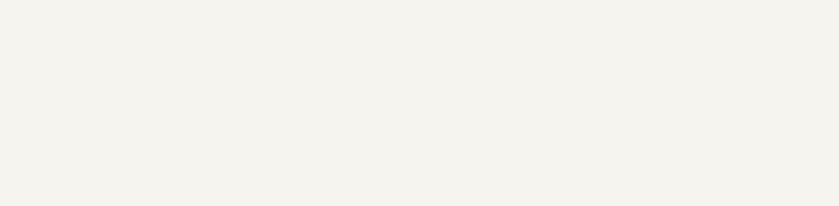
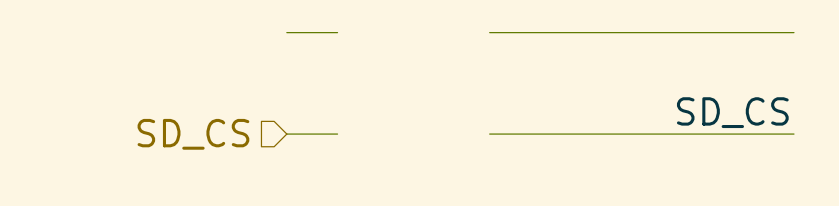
wire: none -> (286, 32) (337, 32)
wire: none -> (489, 32) (793, 32)
label: none -> SD_CS (732, 112)
hierarchical label: none -> SD_CS (193, 134)
wire: none -> (286, 134) (337, 134)
wire: none -> (489, 134) (793, 134)

